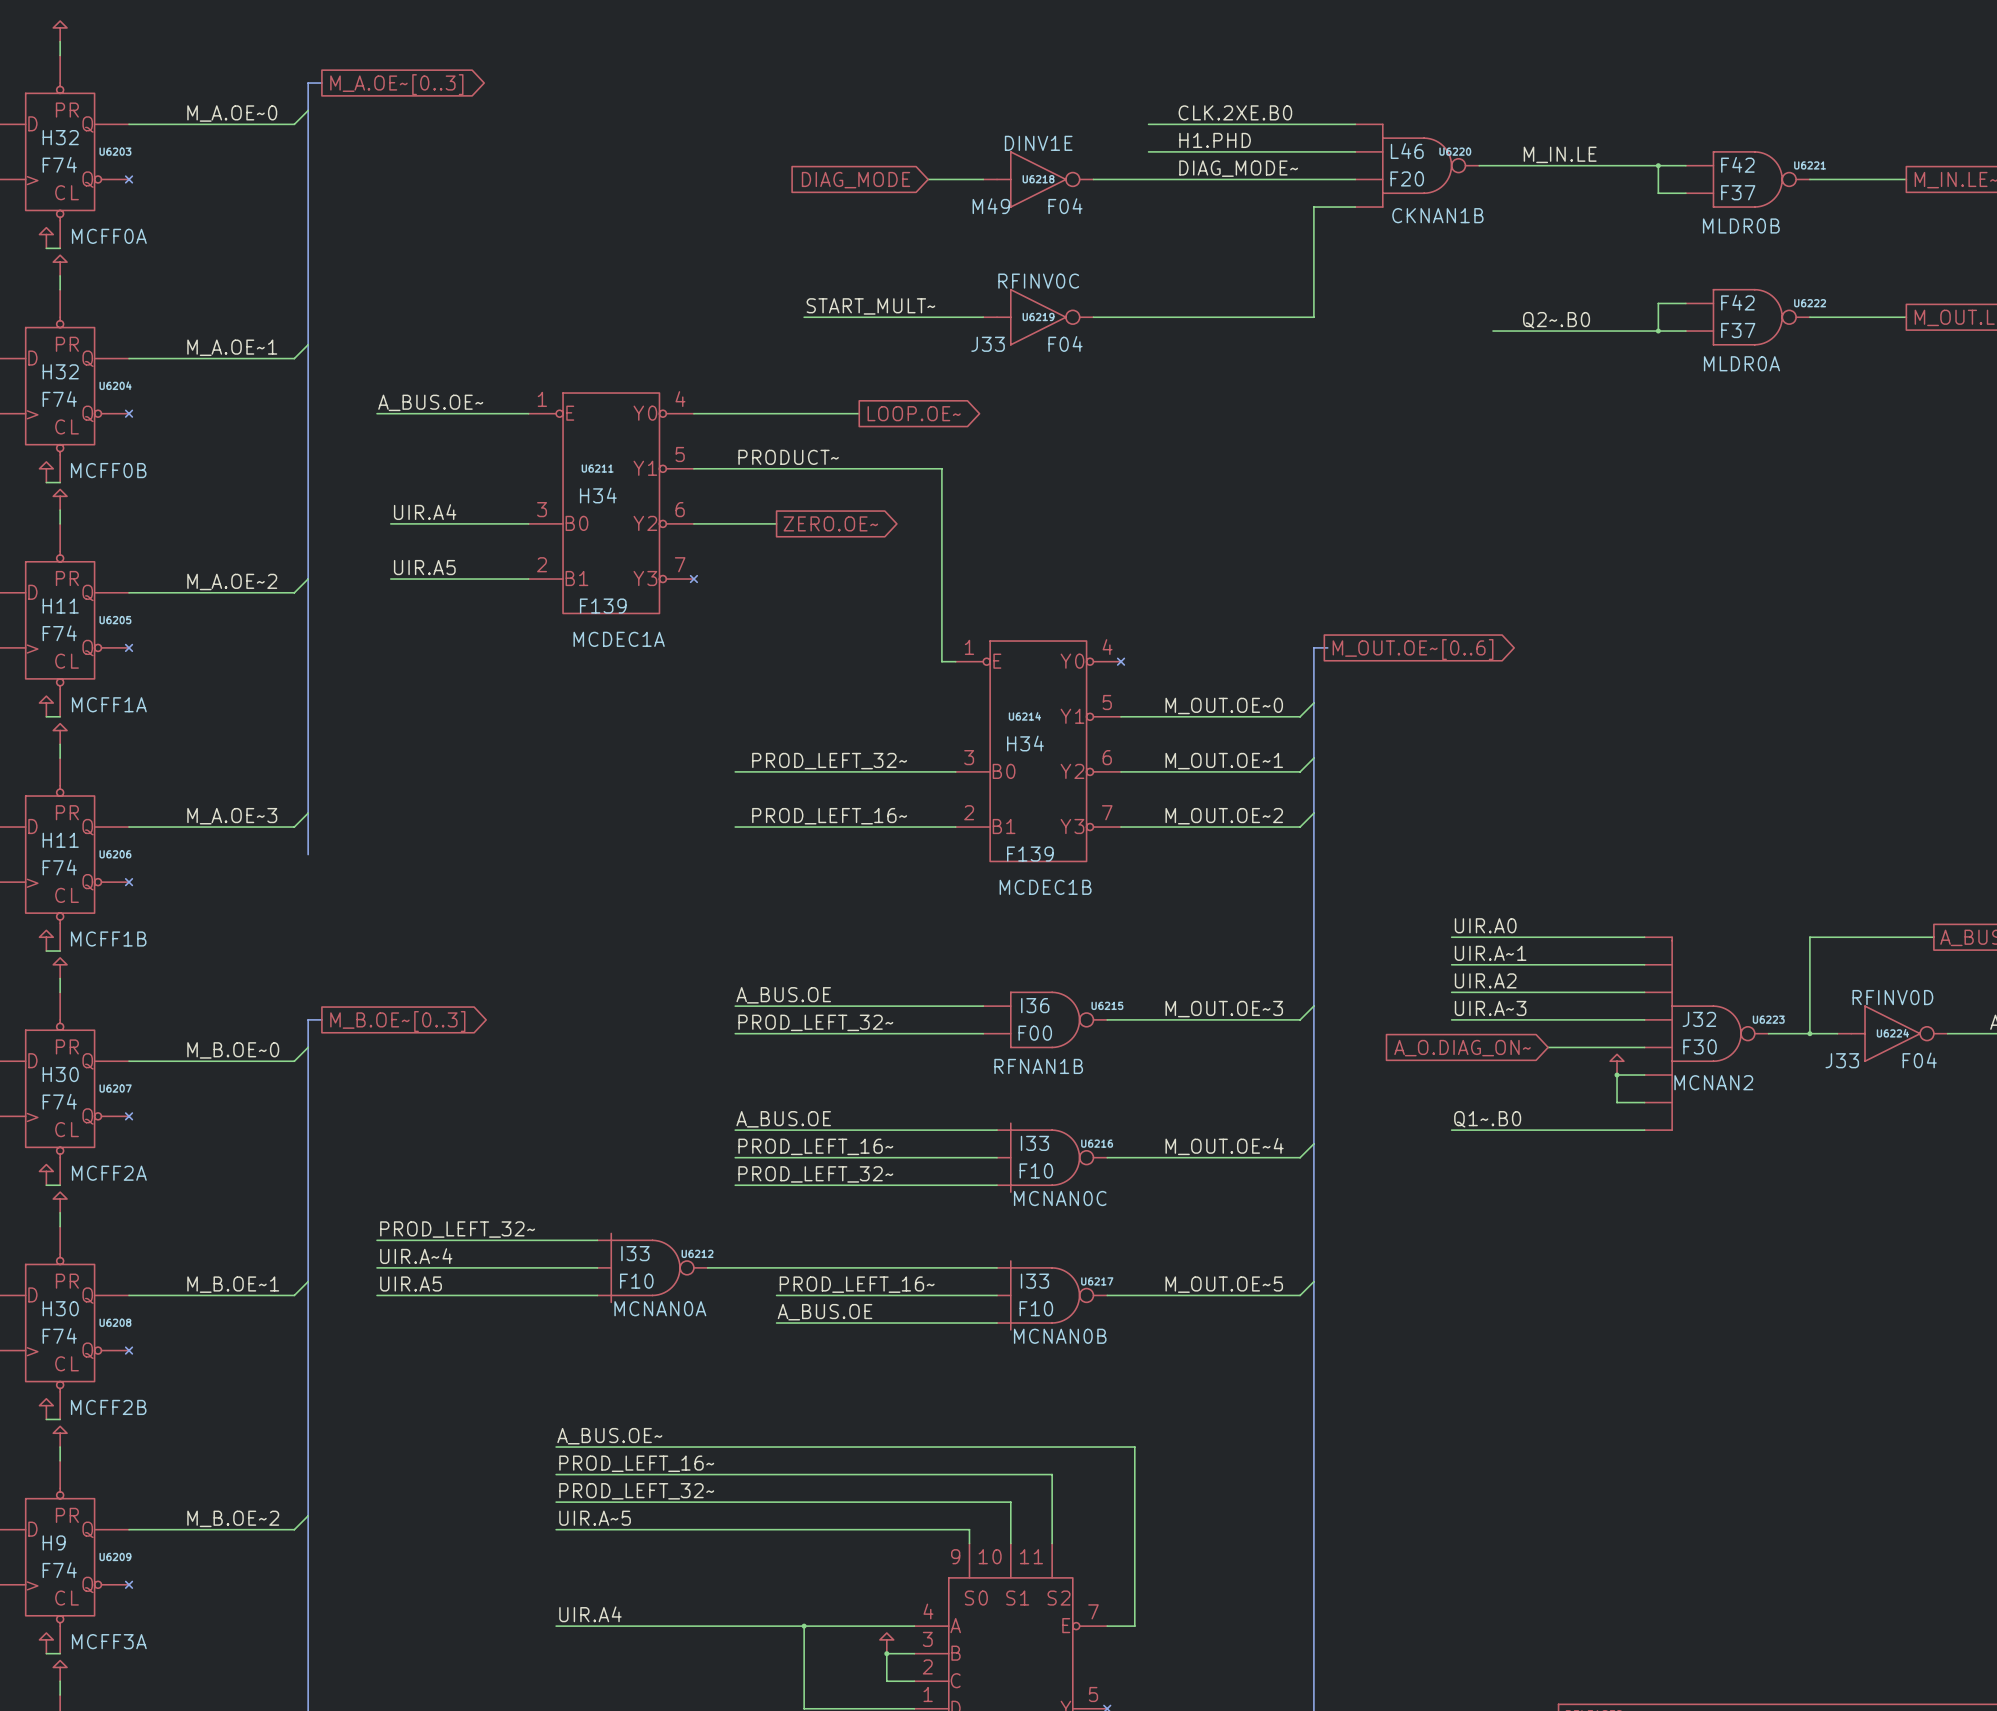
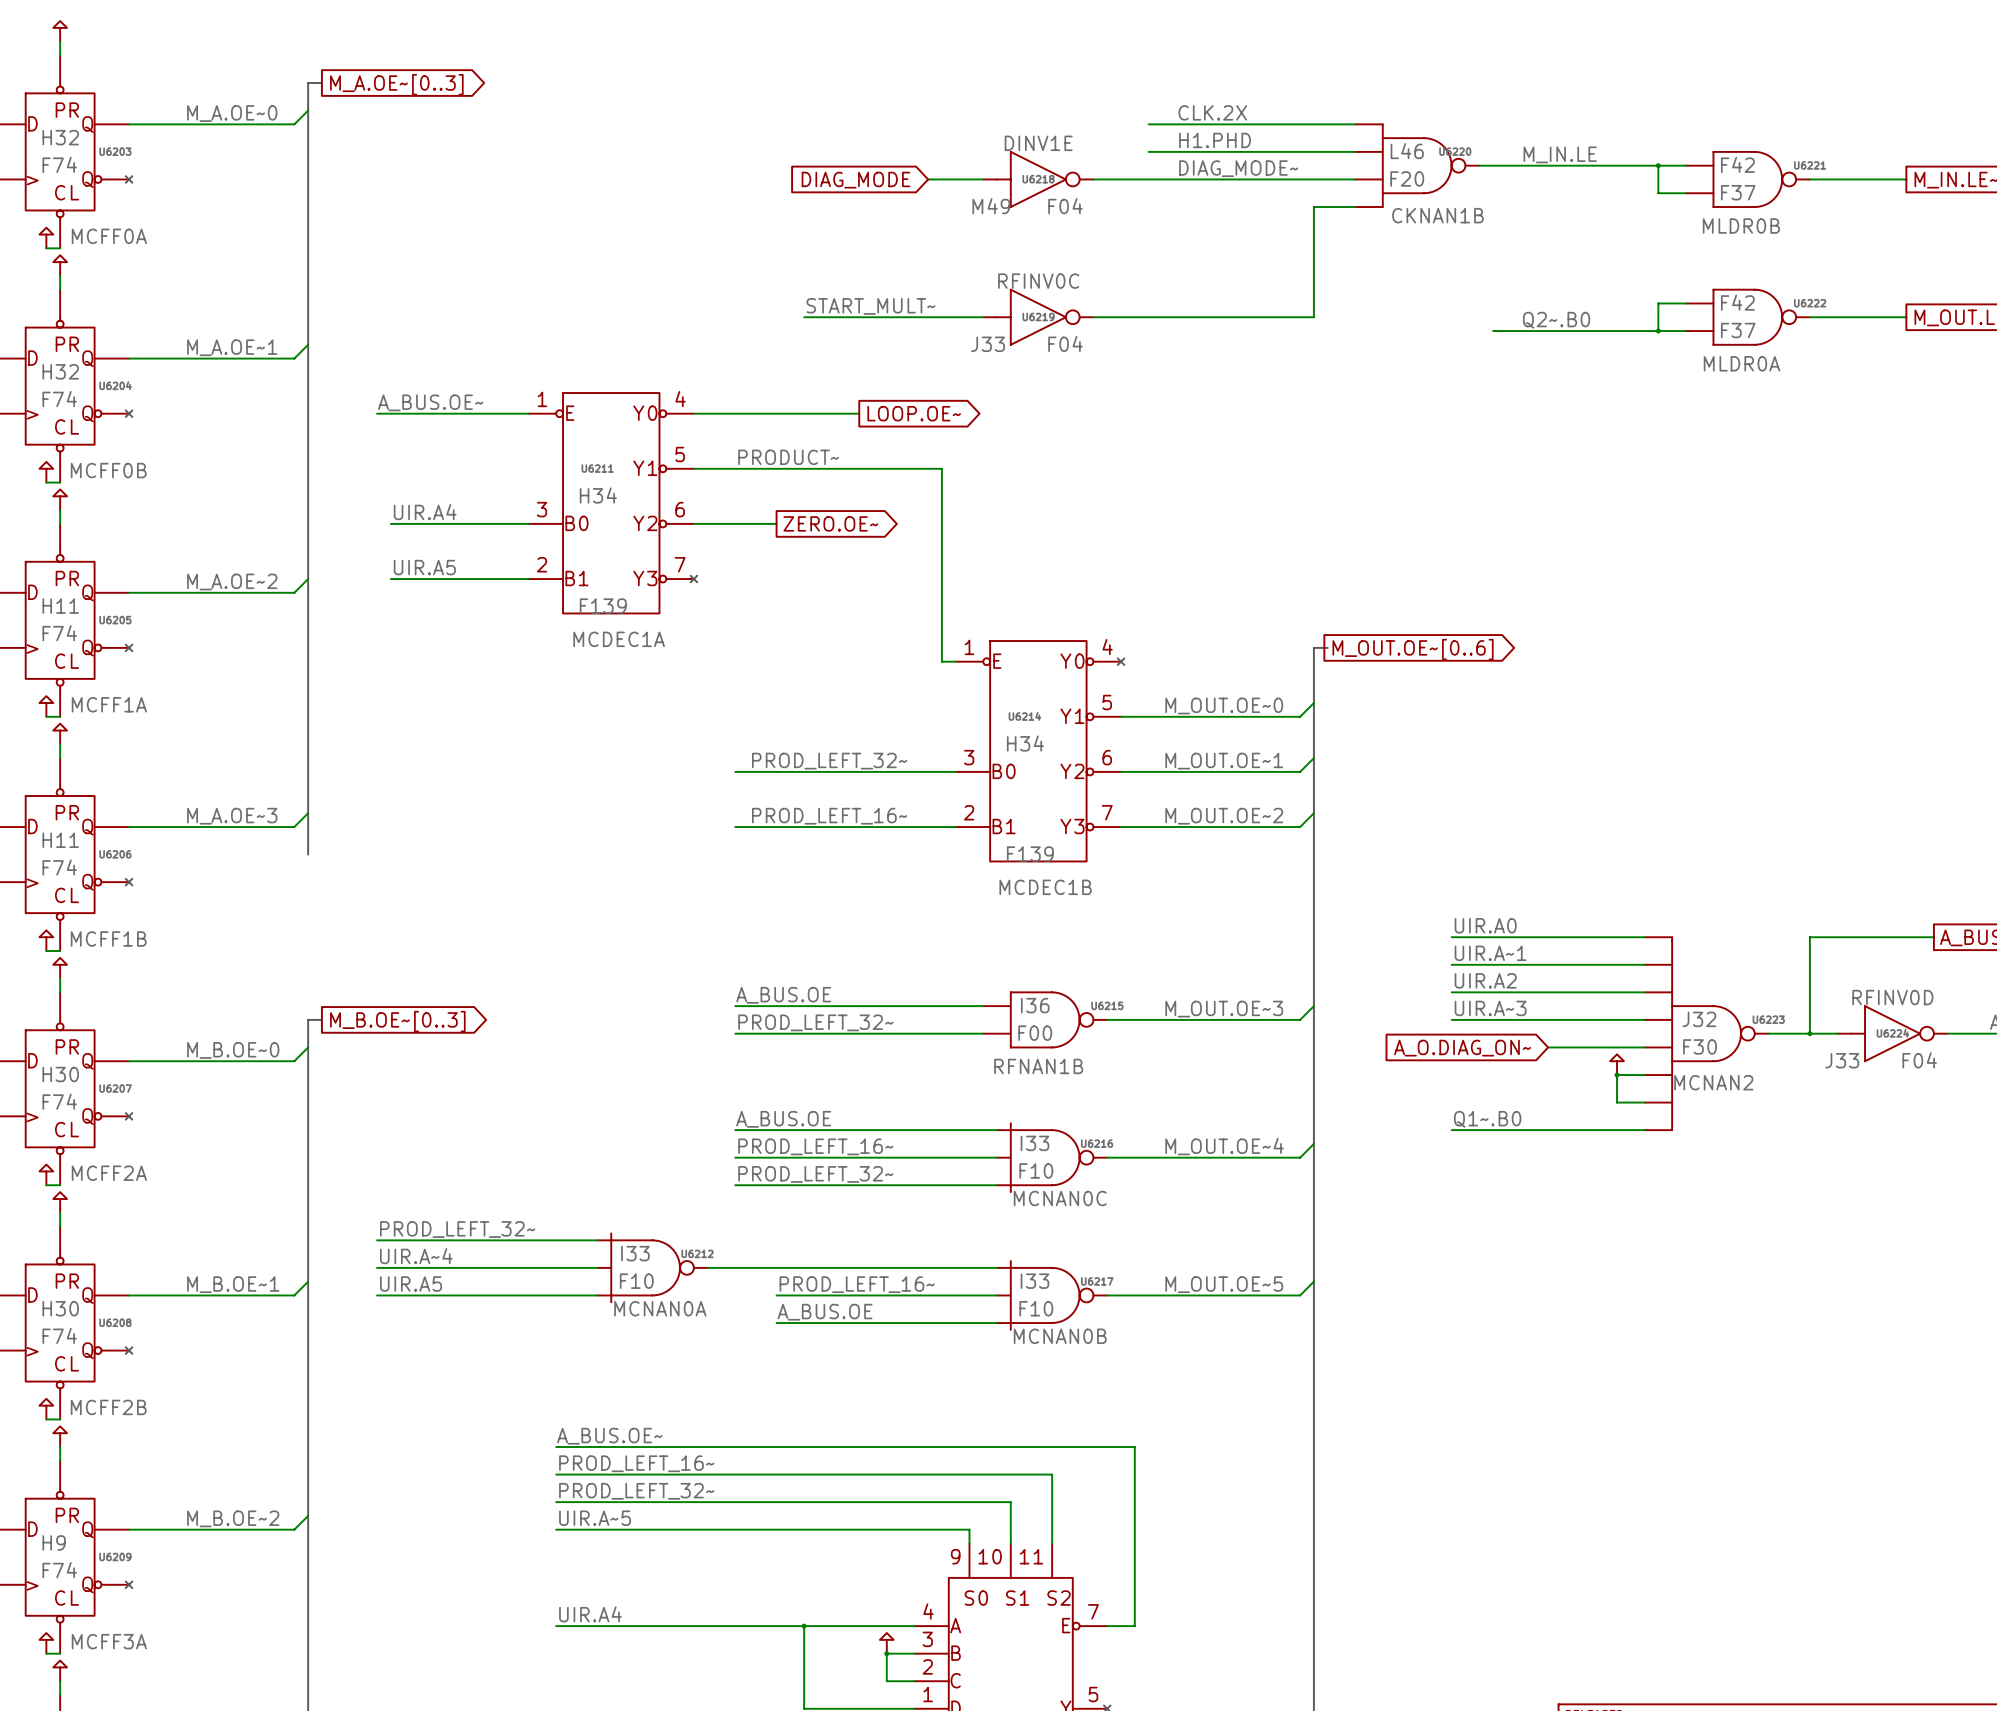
label: CLK.2XE.B0 (1235, 112) -> CLK.2X (1212, 112)

